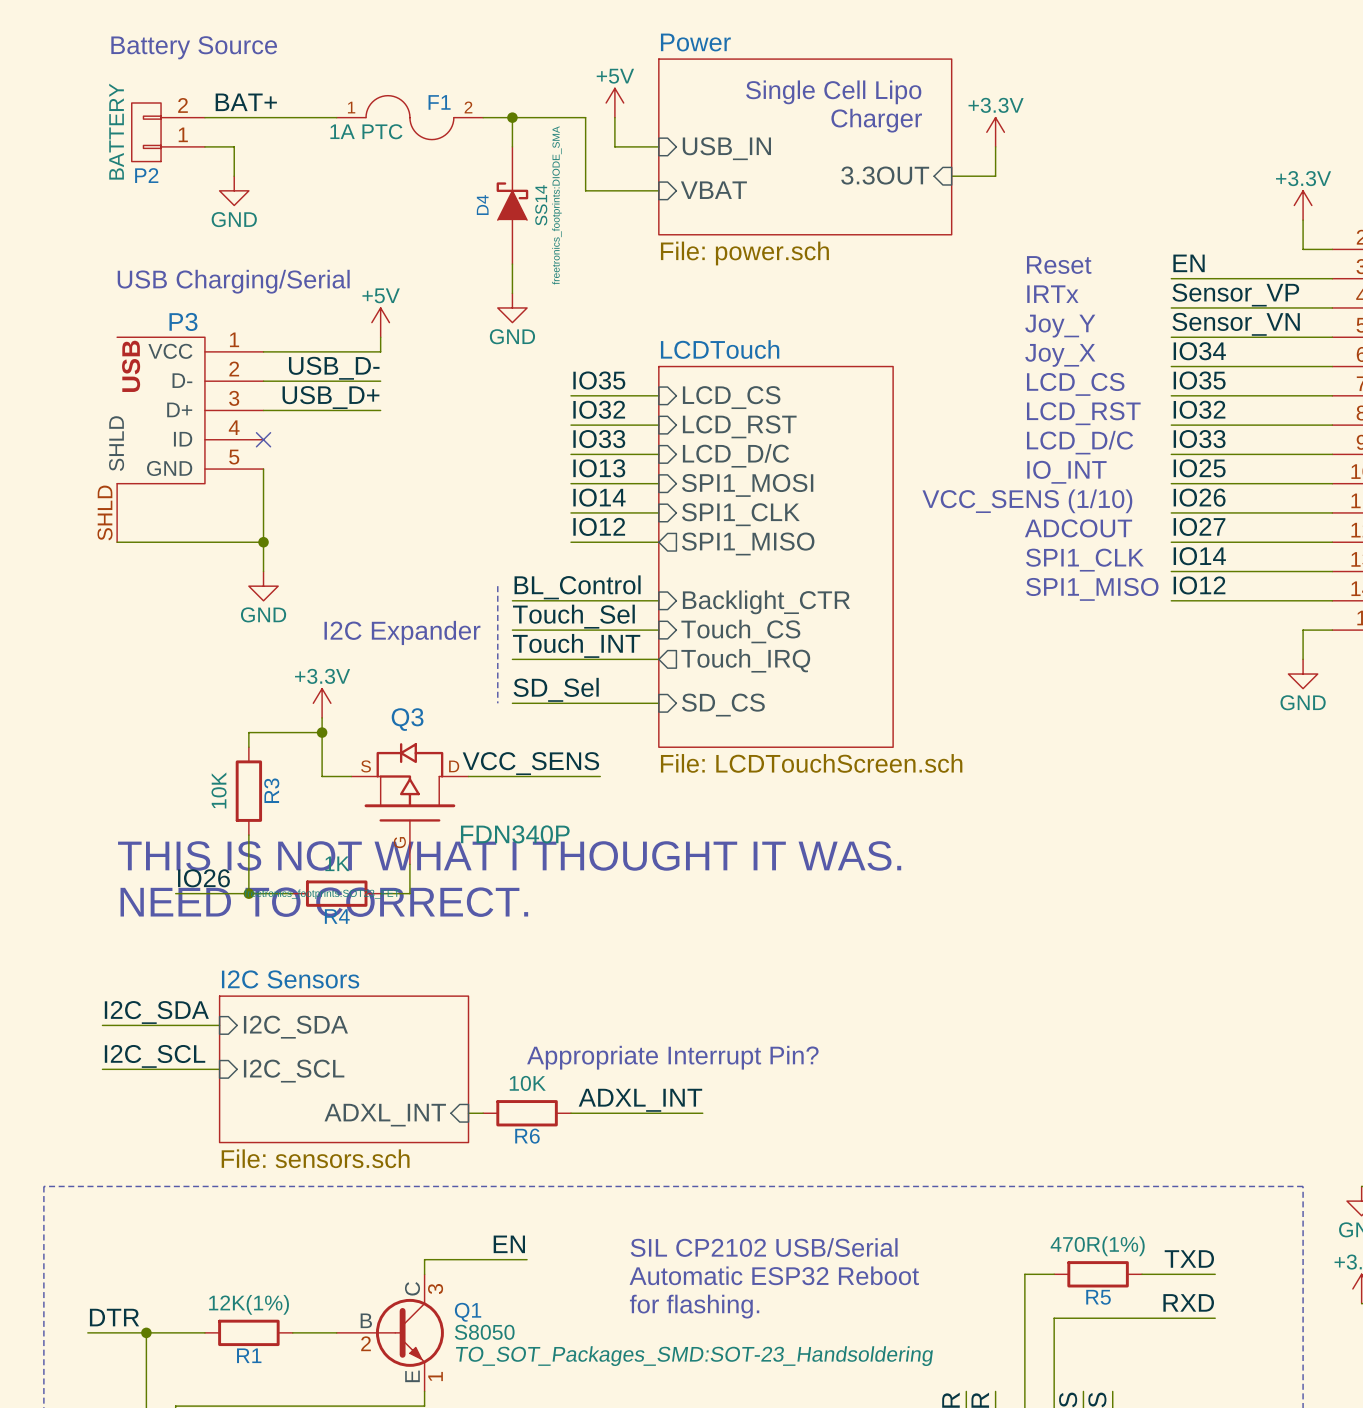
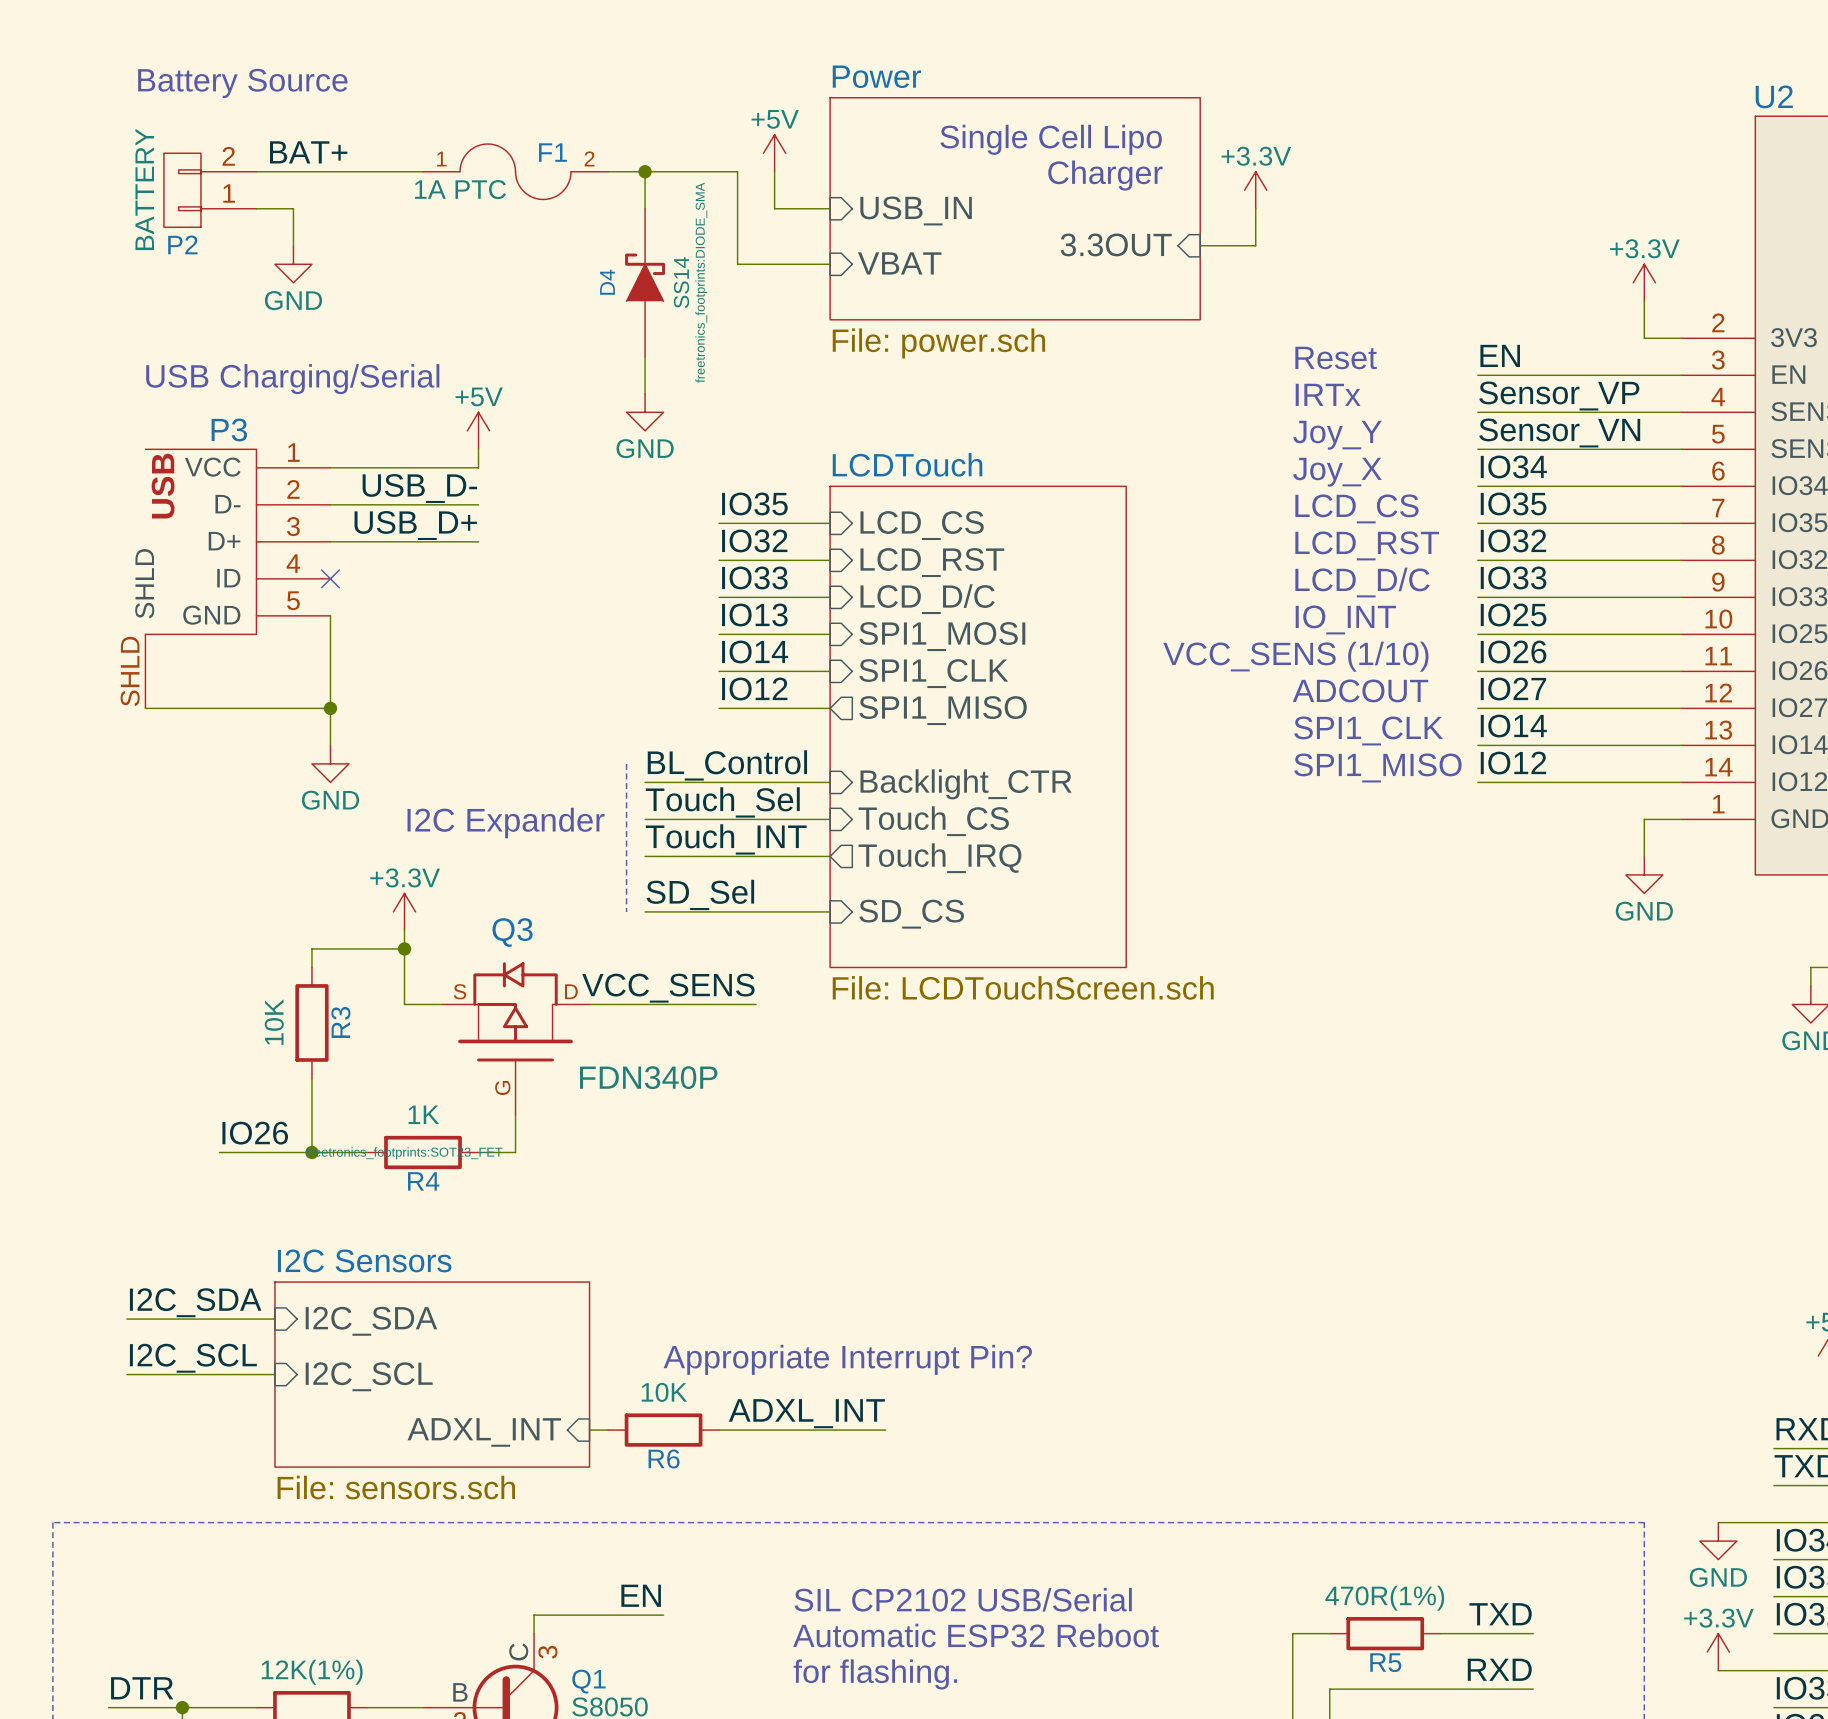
text: THIS IS NOT WHAT I THOUGHT IT WAS. (509, 855) -> none
text: NEED TO CORRECT. (324, 902) -> none

